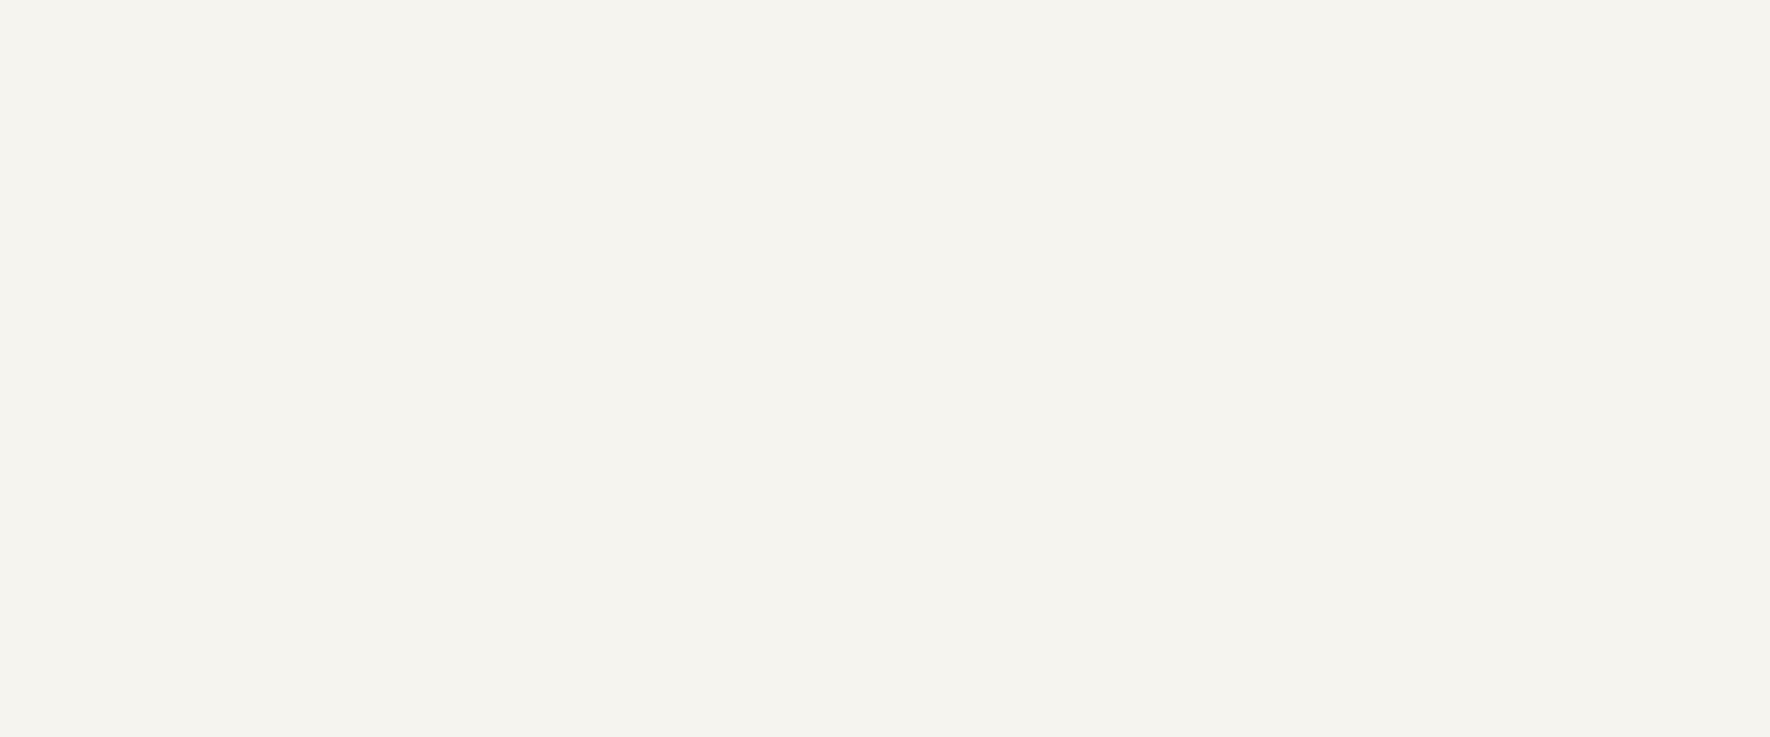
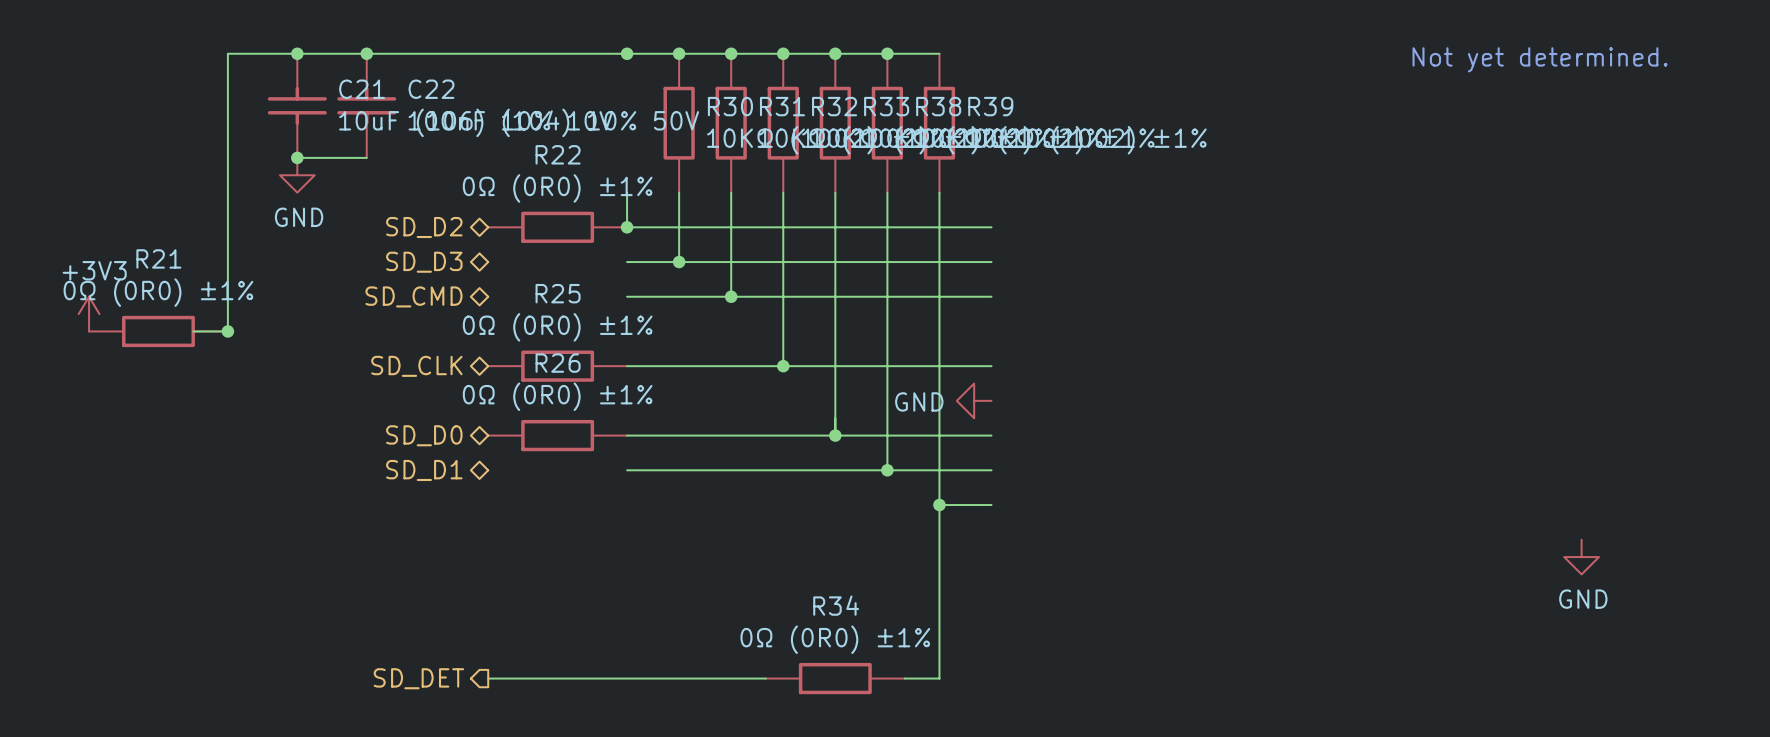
junction: none -> (297, 53)
junction: none -> (366, 53)
junction: none -> (627, 53)
junction: none -> (679, 53)
junction: none -> (731, 53)
junction: none -> (783, 53)
junction: none -> (835, 53)
junction: none -> (887, 53)
wire: none -> (939, 53) (227, 53) (227, 331) (193, 331)
text: none -> Not yet determined. (1540, 59)
C21: none -> (297, 105)
C22: none -> (366, 105)
R30: none -> (679, 123)
R31: none -> (731, 123)
R32: none -> (783, 123)
R33: none -> (835, 123)
R38: none -> (887, 123)
R39: none -> (939, 123)
wire: none -> (297, 157) (366, 157)
junction: none -> (297, 157)
power symbol: none -> GND (297, 175)
wire: none -> (627, 192) (627, 227) (991, 227)
wire: none -> (679, 192) (679, 262)
wire: none -> (731, 192) (731, 296)
wire: none -> (783, 192) (783, 366)
wire: none -> (835, 192) (835, 435)
wire: none -> (887, 192) (887, 470)
wire: none -> (939, 192) (939, 678) (904, 678)
hierarchical label: none -> SD_D2 (424, 227)
R22: none -> (557, 227)
junction: none -> (627, 227)
hierarchical label: none -> SD_D3 (424, 262)
wire: none -> (627, 262) (991, 262)
junction: none -> (679, 262)
hierarchical label: none -> SD_CMD (413, 296)
wire: none -> (627, 296) (991, 296)
junction: none -> (731, 296)
power symbol: none -> +3V3 (89, 314)
R21: none -> (158, 331)
junction: none -> (227, 331)
hierarchical label: none -> SD_CLK (416, 366)
R25: none -> (557, 366)
wire: none -> (627, 366) (991, 366)
junction: none -> (783, 366)
power symbol: none -> GND (974, 400)
hierarchical label: none -> SD_D0 (424, 435)
R26: none -> (557, 435)
wire: none -> (627, 435) (991, 435)
junction: none -> (835, 435)
hierarchical label: none -> SD_D1 (424, 470)
wire: none -> (627, 470) (991, 470)
junction: none -> (887, 470)
wire: none -> (939, 505) (991, 505)
junction: none -> (939, 505)
power symbol: none -> GND (1581, 557)
hierarchical label: none -> SD_DET (418, 678)
wire: none -> (488, 678) (765, 678)
R34: none -> (835, 678)

